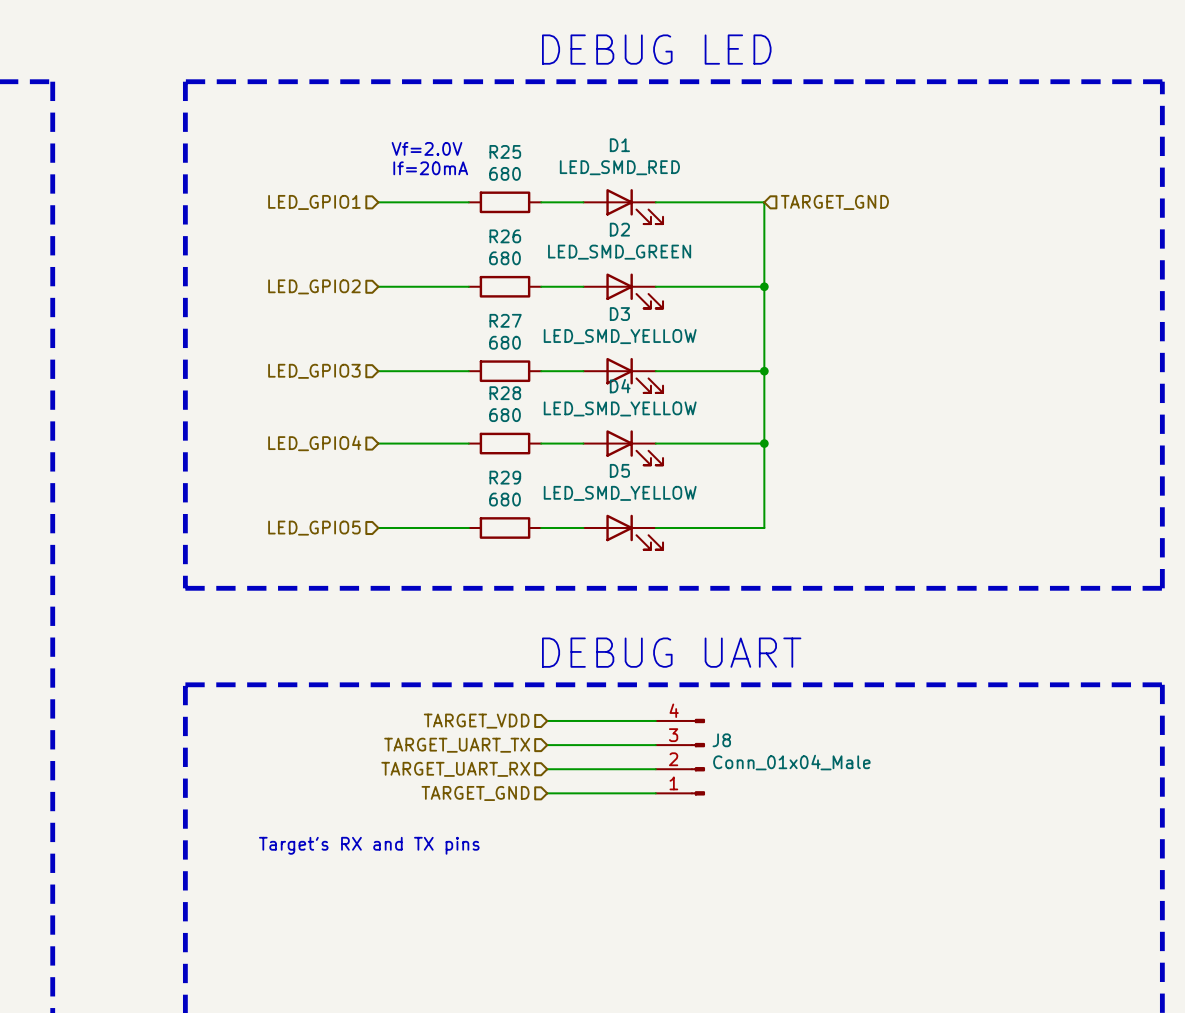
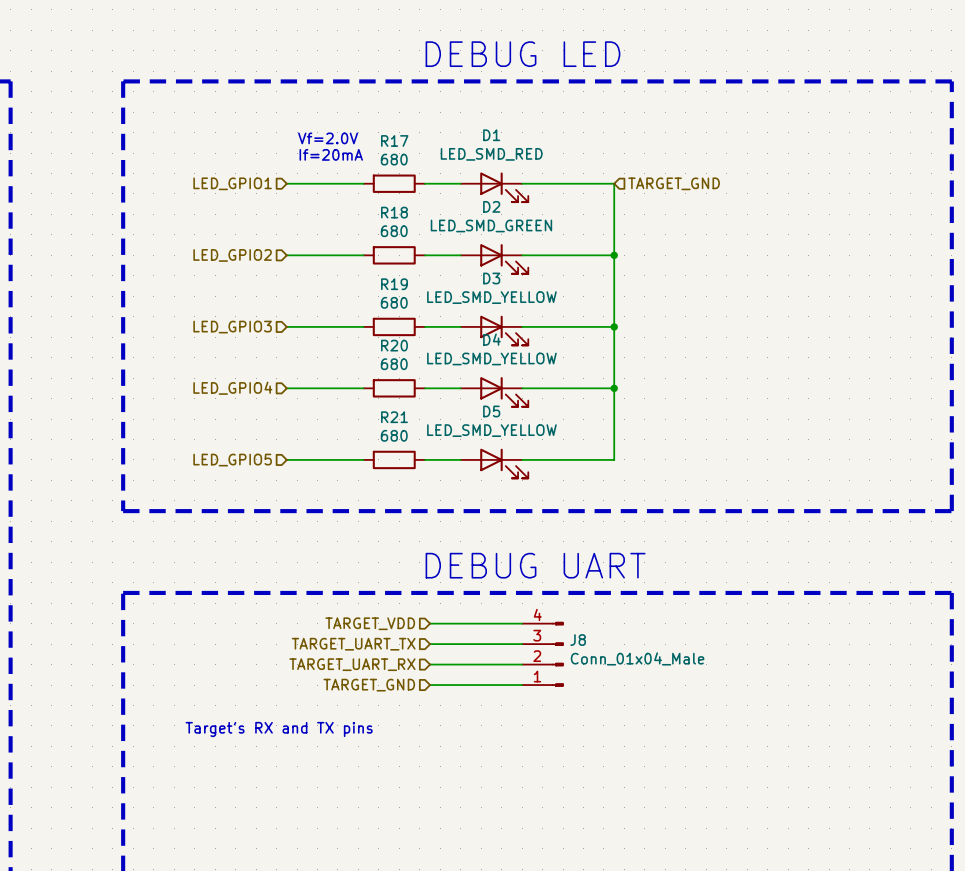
R25 name: R25 (505, 151) -> R17 (394, 140)
R26 name: R26 (505, 236) -> R18 (394, 212)
R27 name: R27 (505, 320) -> R19 (394, 284)
R28 name: R28 (505, 393) -> R20 (394, 345)
R29 name: R29 (505, 477) -> R21 (394, 417)

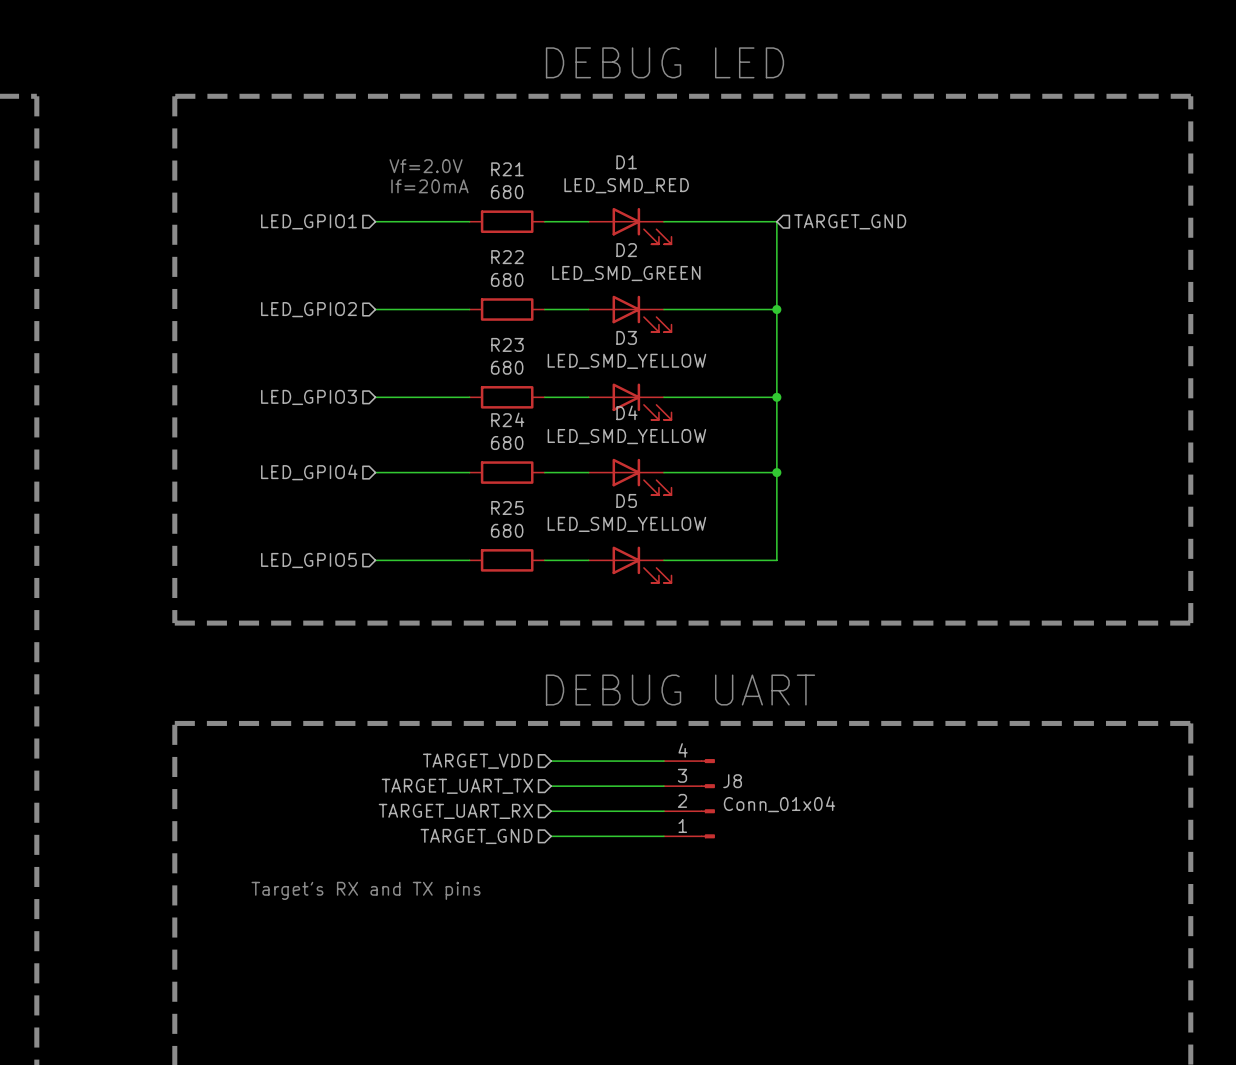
R17 name: R17 (394, 140) -> R21 (507, 169)
R18 name: R18 (394, 212) -> R22 (507, 257)
R19 name: R19 (394, 284) -> R23 (507, 344)
R20 name: R20 (394, 345) -> R24 (507, 419)
R21 name: R21 (394, 417) -> R25 (507, 507)
J8 value: Conn_01x04_Male (637, 658) -> Conn_01x04 (779, 804)

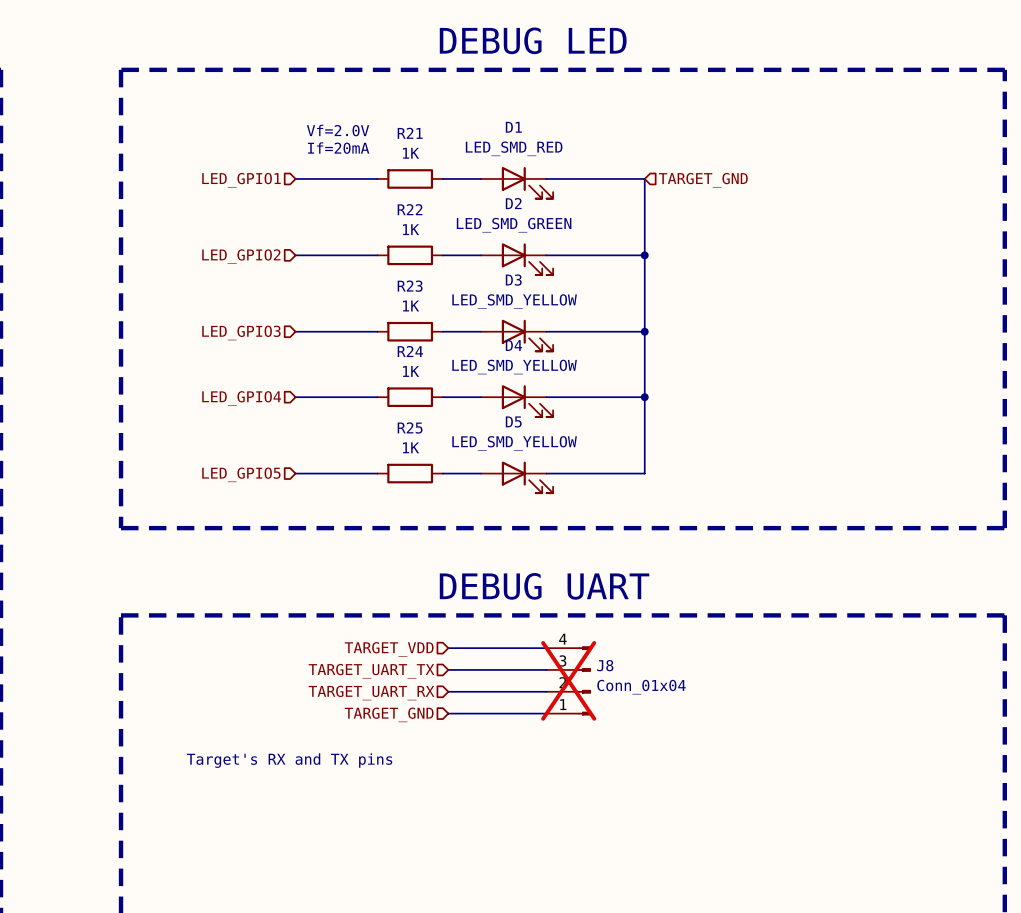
R21 value: 680 (507, 192) -> 1K (411, 153)
R22 value: 680 (507, 279) -> 1K (411, 229)
R23 value: 680 (507, 367) -> 1K (411, 306)
R24 value: 680 (507, 443) -> 1K (411, 371)
R25 value: 680 (507, 530) -> 1K (411, 447)
J8 do-not-place cross: none -> (568, 680)

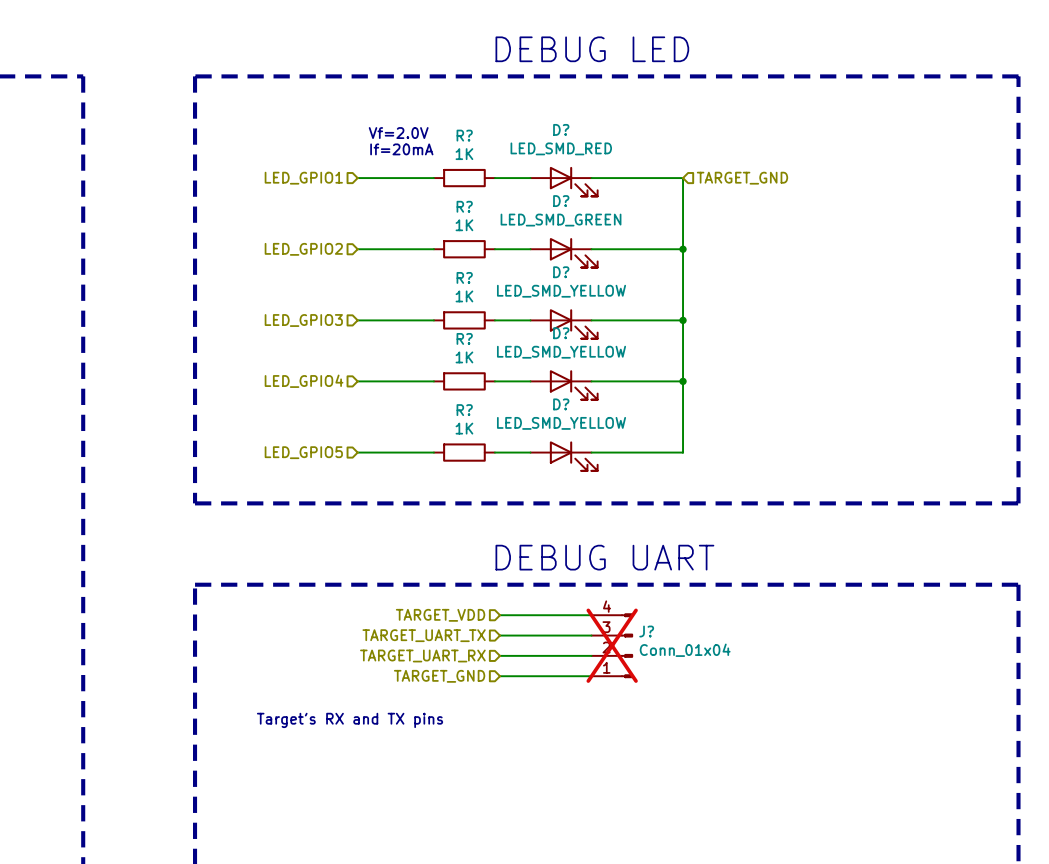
D1 name: D1 (513, 127) -> D? (561, 129)
R21 name: R21 (410, 133) -> R? (464, 135)
D2 name: D2 (513, 203) -> D? (561, 201)
R22 name: R22 (410, 209) -> R? (464, 206)
D3 name: D3 (513, 280) -> D? (561, 272)
R23 name: R23 (410, 286) -> R? (464, 277)
D4 name: D4 (513, 345) -> D? (561, 333)
R24 name: R24 (410, 351) -> R? (464, 338)
D5 name: D5 (513, 421) -> D? (561, 404)
R25 name: R25 (410, 427) -> R? (464, 410)
J8 name: J8 (605, 665) -> J? (646, 631)

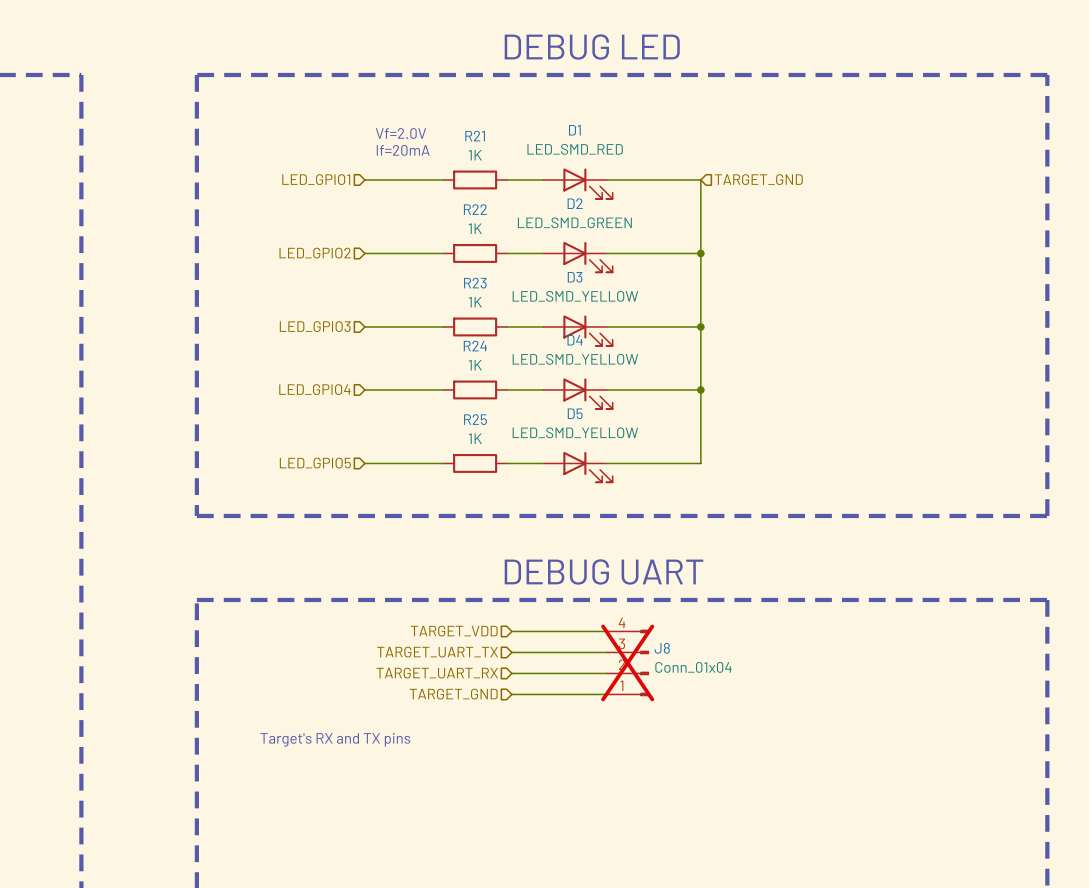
D? name: D? (561, 129) -> D1 (574, 130)
R? name: R? (464, 135) -> R21 (475, 136)
D? name: D? (561, 201) -> D2 (575, 203)
R? name: R? (464, 206) -> R22 (475, 209)
D? name: D? (561, 272) -> D3 (575, 277)
R? name: R? (464, 277) -> R23 (475, 283)
D? name: D? (561, 333) -> D4 (575, 340)
R? name: R? (464, 338) -> R24 (475, 346)
D? name: D? (561, 404) -> D5 (575, 413)
R? name: R? (464, 410) -> R25 (475, 419)
J? name: J? (646, 631) -> J8 (662, 648)

